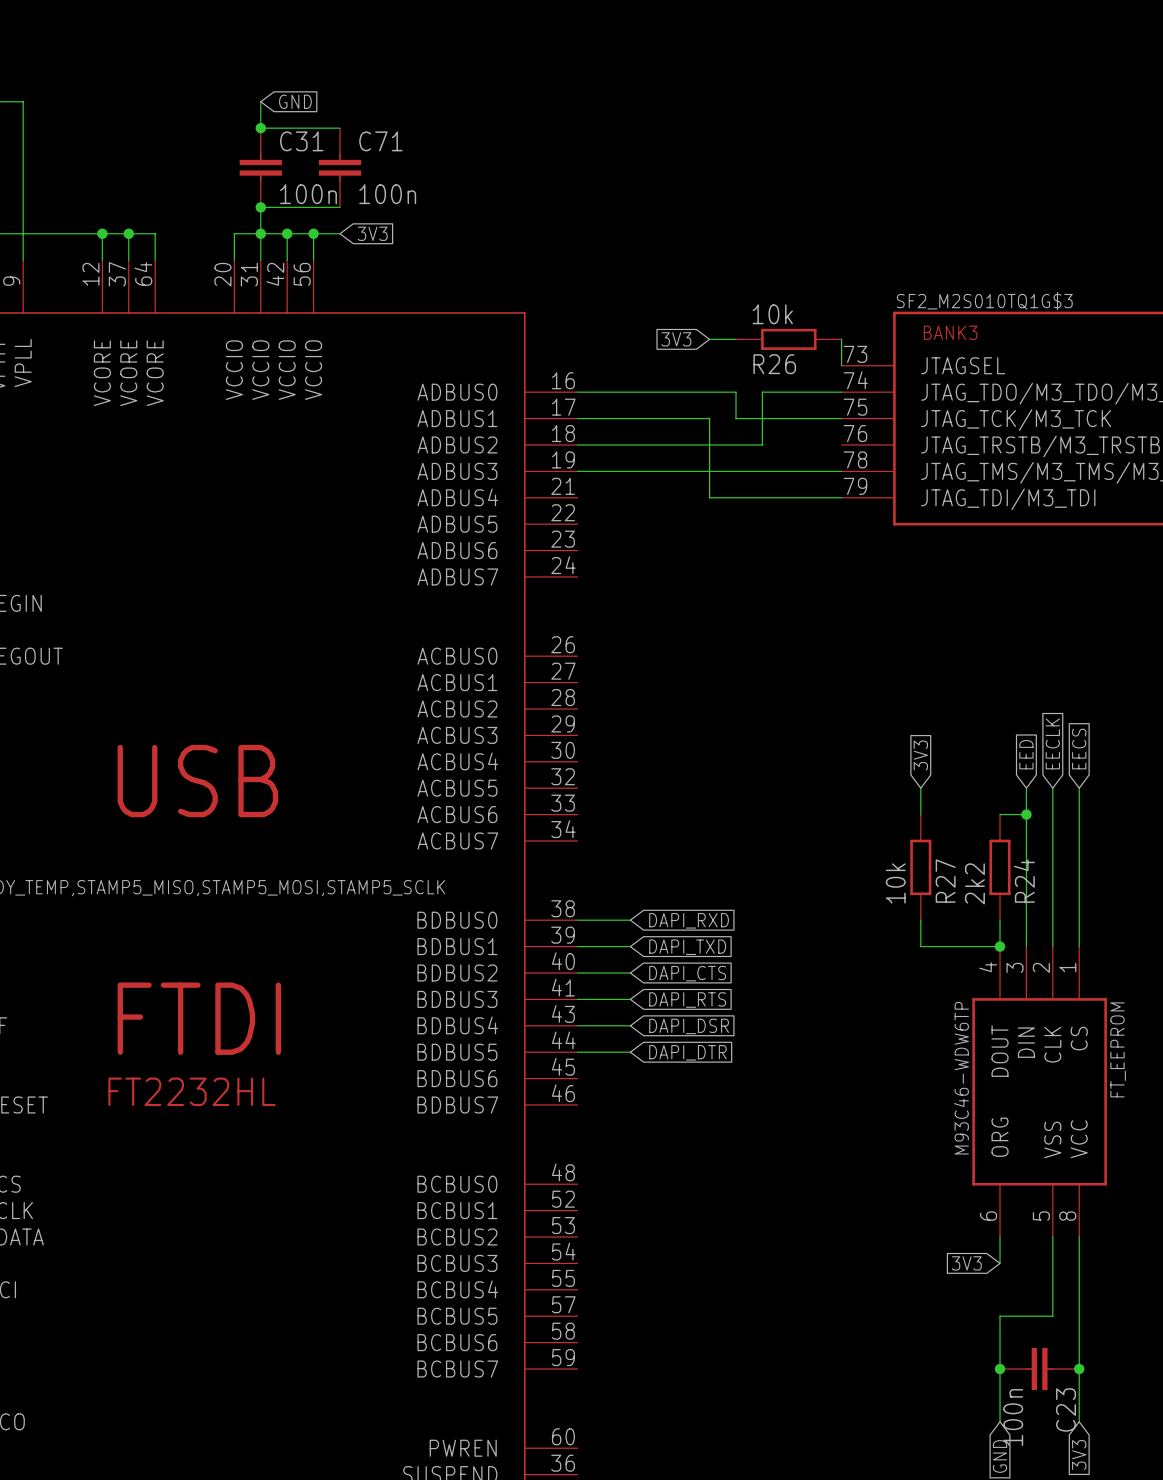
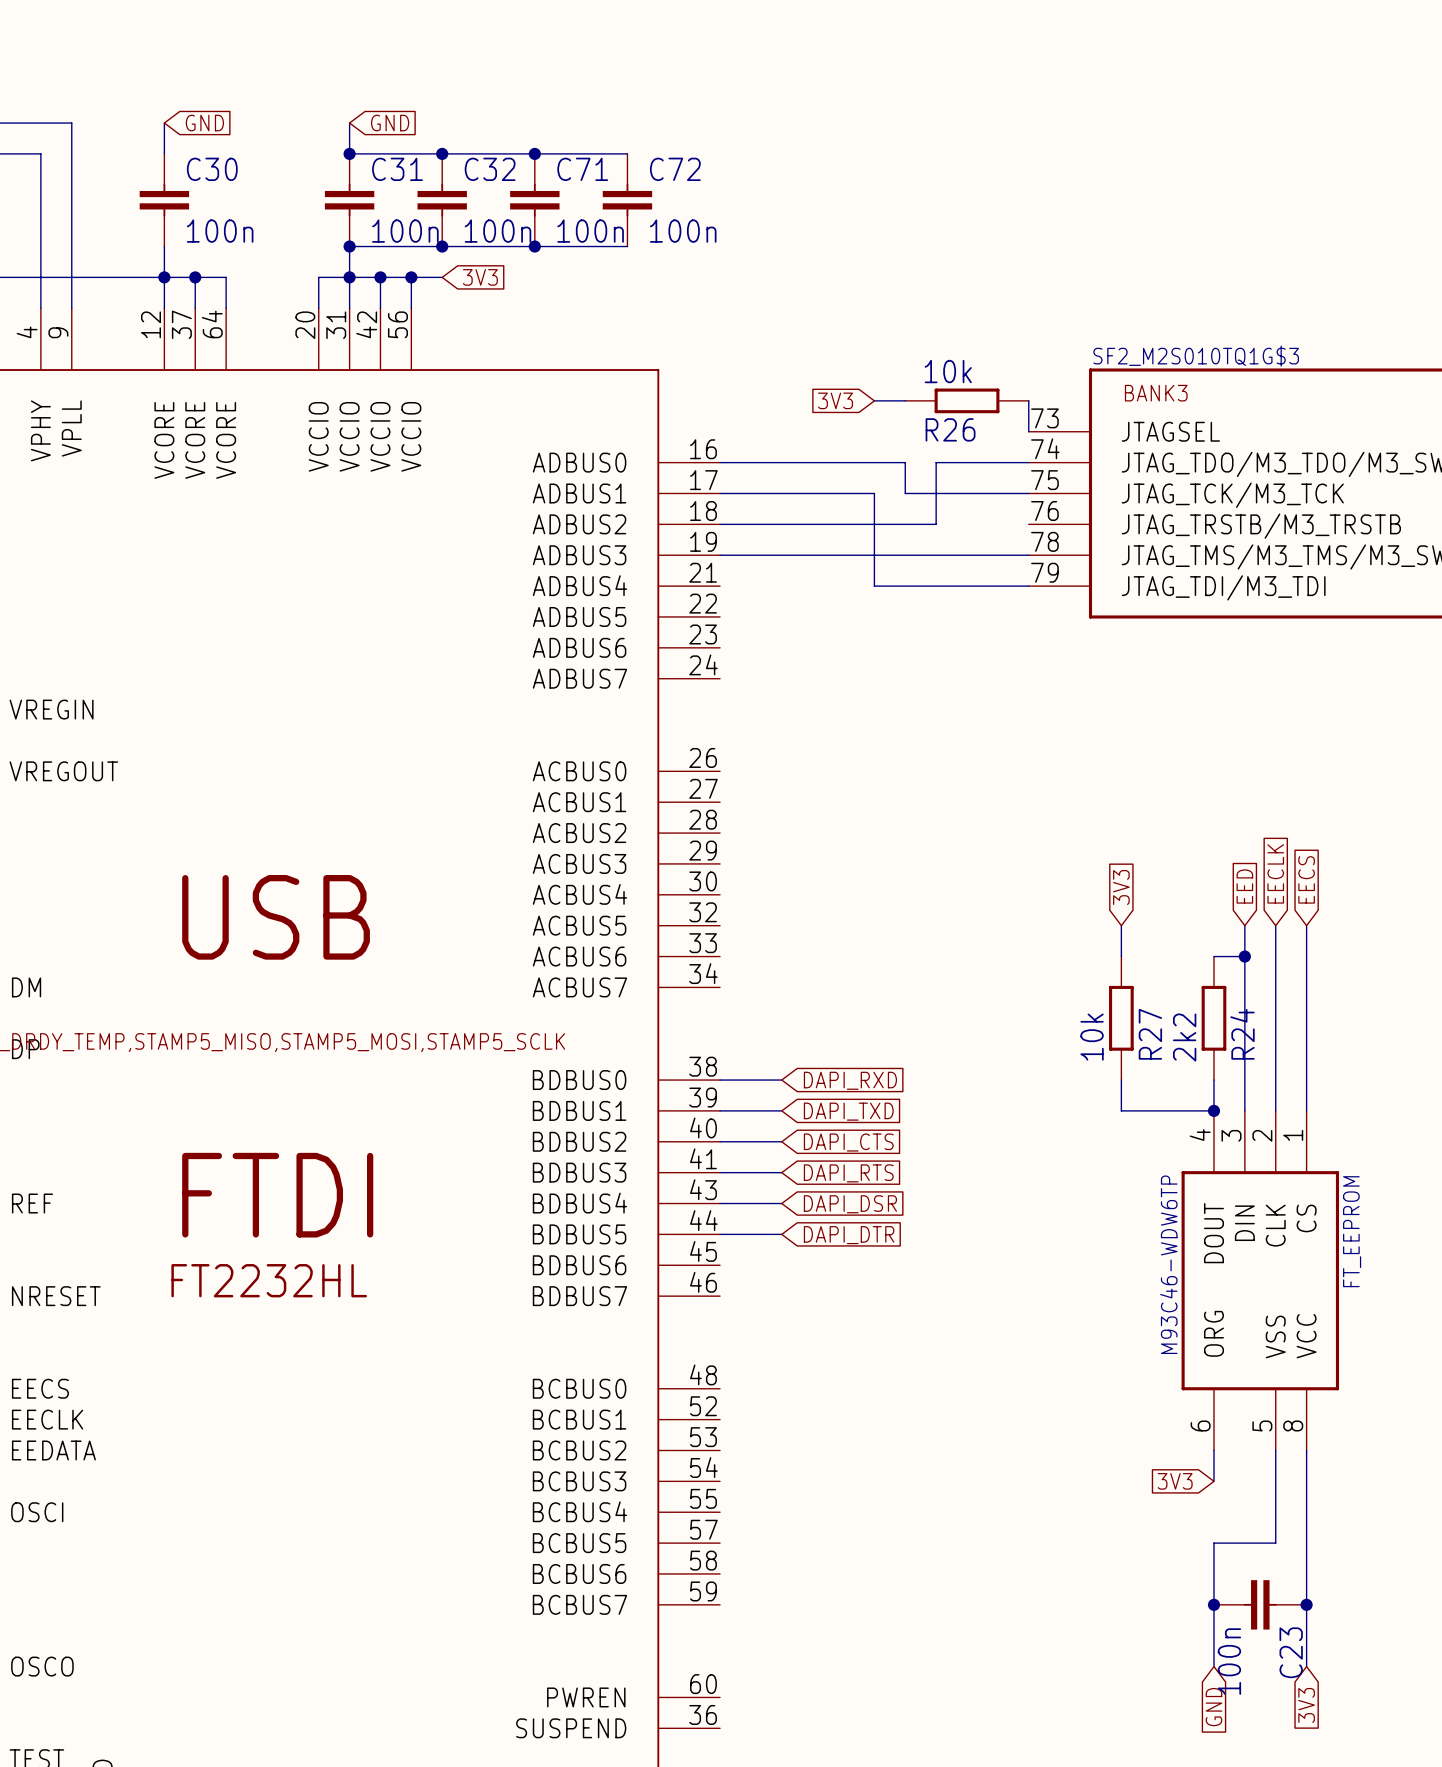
wire: none -> (164, 123) (164, 153)
global label: none -> GND (204, 123)
wire: none -> (442, 153) (627, 153)
junction: none -> (442, 153)
junction: none -> (534, 153)
C71 name: C71 (380, 141) -> C32 (490, 169)
C30: none -> 100n (164, 200)
C71: none -> 100n (534, 200)
C72: none -> 100n (627, 200)
wire: none -> (164, 246) (164, 277)
wire: none -> (442, 246) (627, 246)
junction: none -> (442, 246)
junction: none -> (534, 246)

